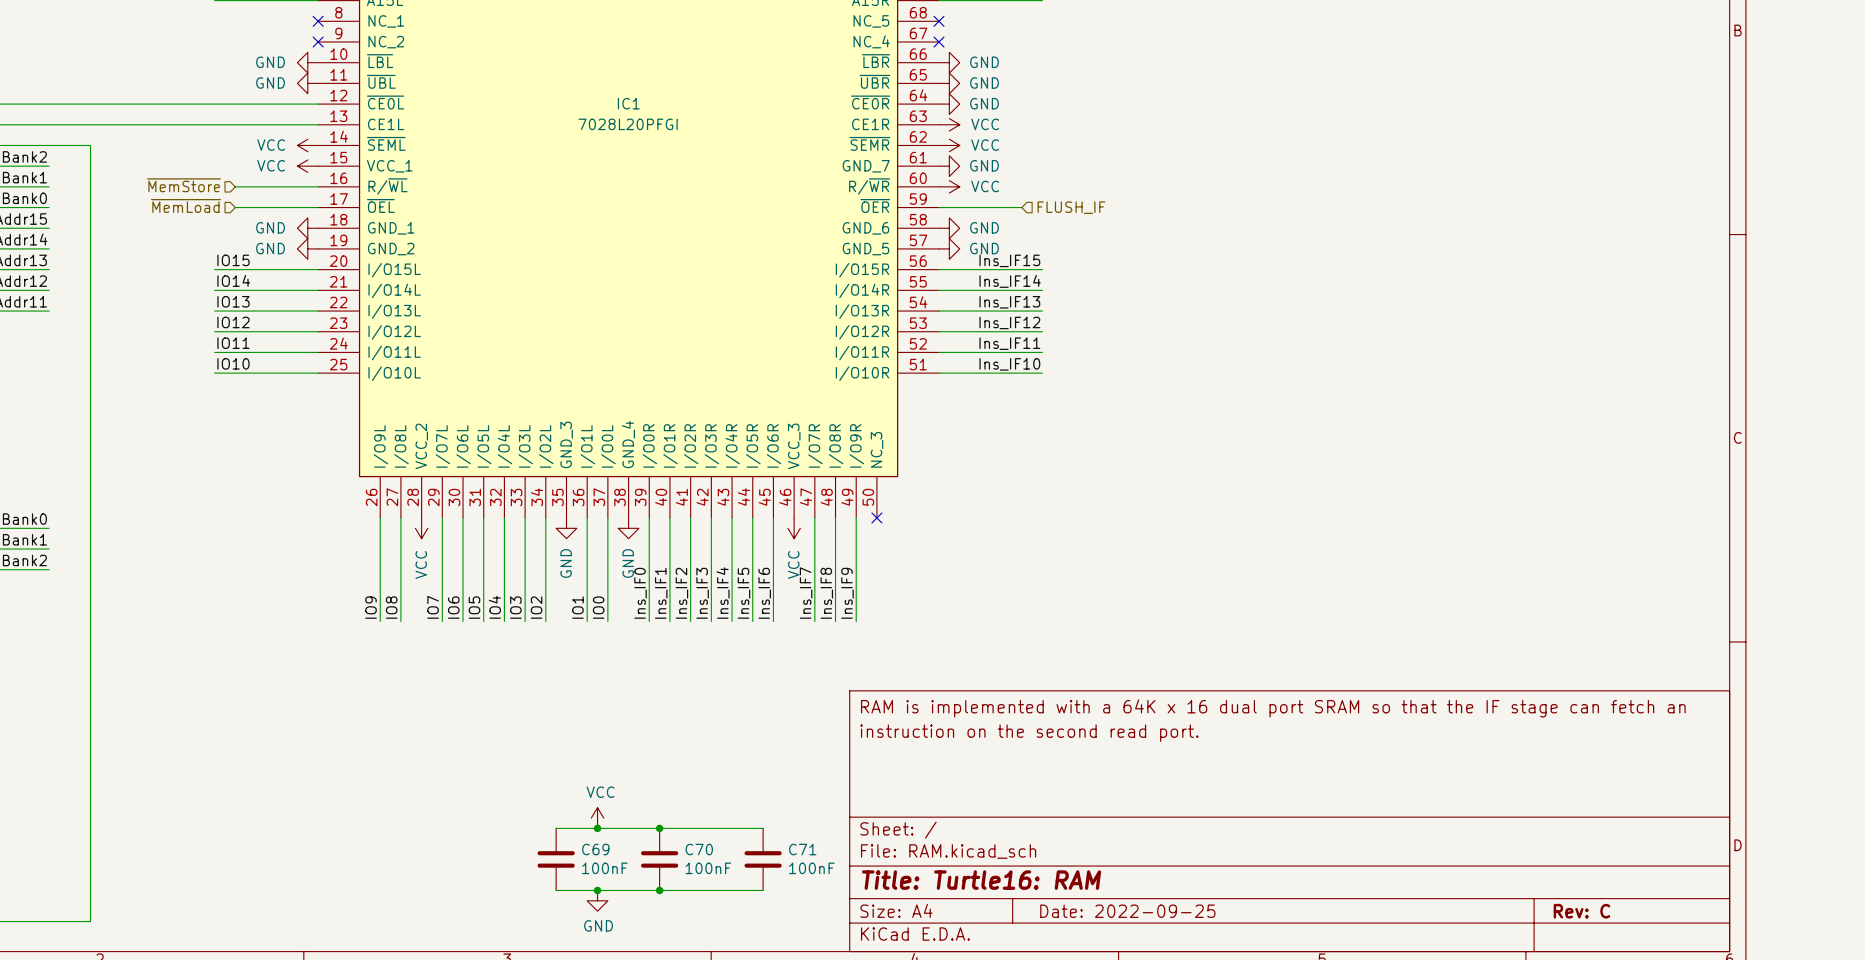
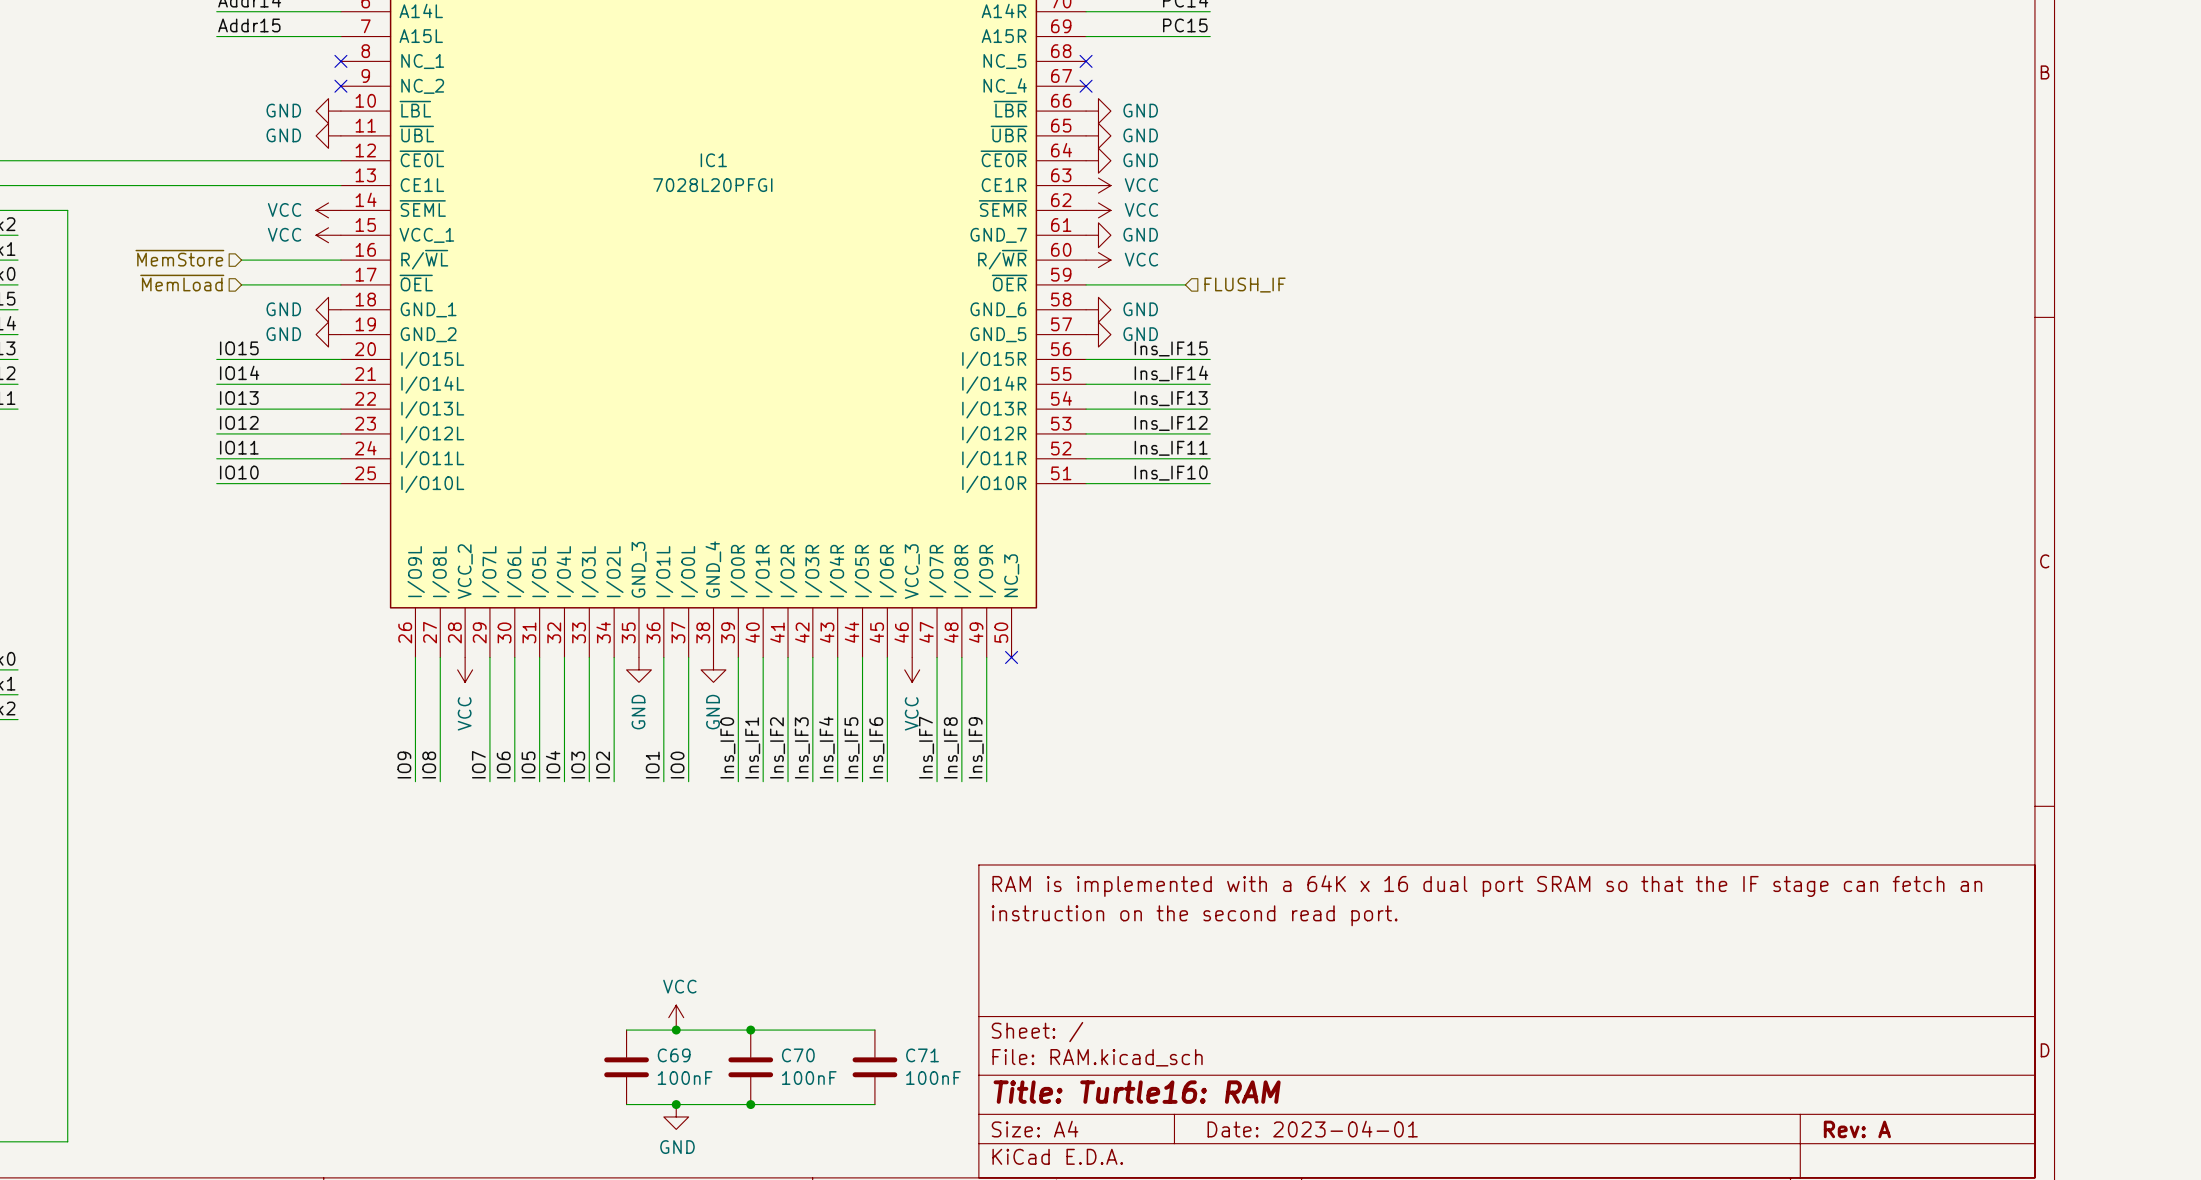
title block: Date: 2022-09-25 (1127, 911) -> Date: 2023-04-01 (1312, 1129)
title block: Rev: C (1581, 911) -> Rev: A (1857, 1129)

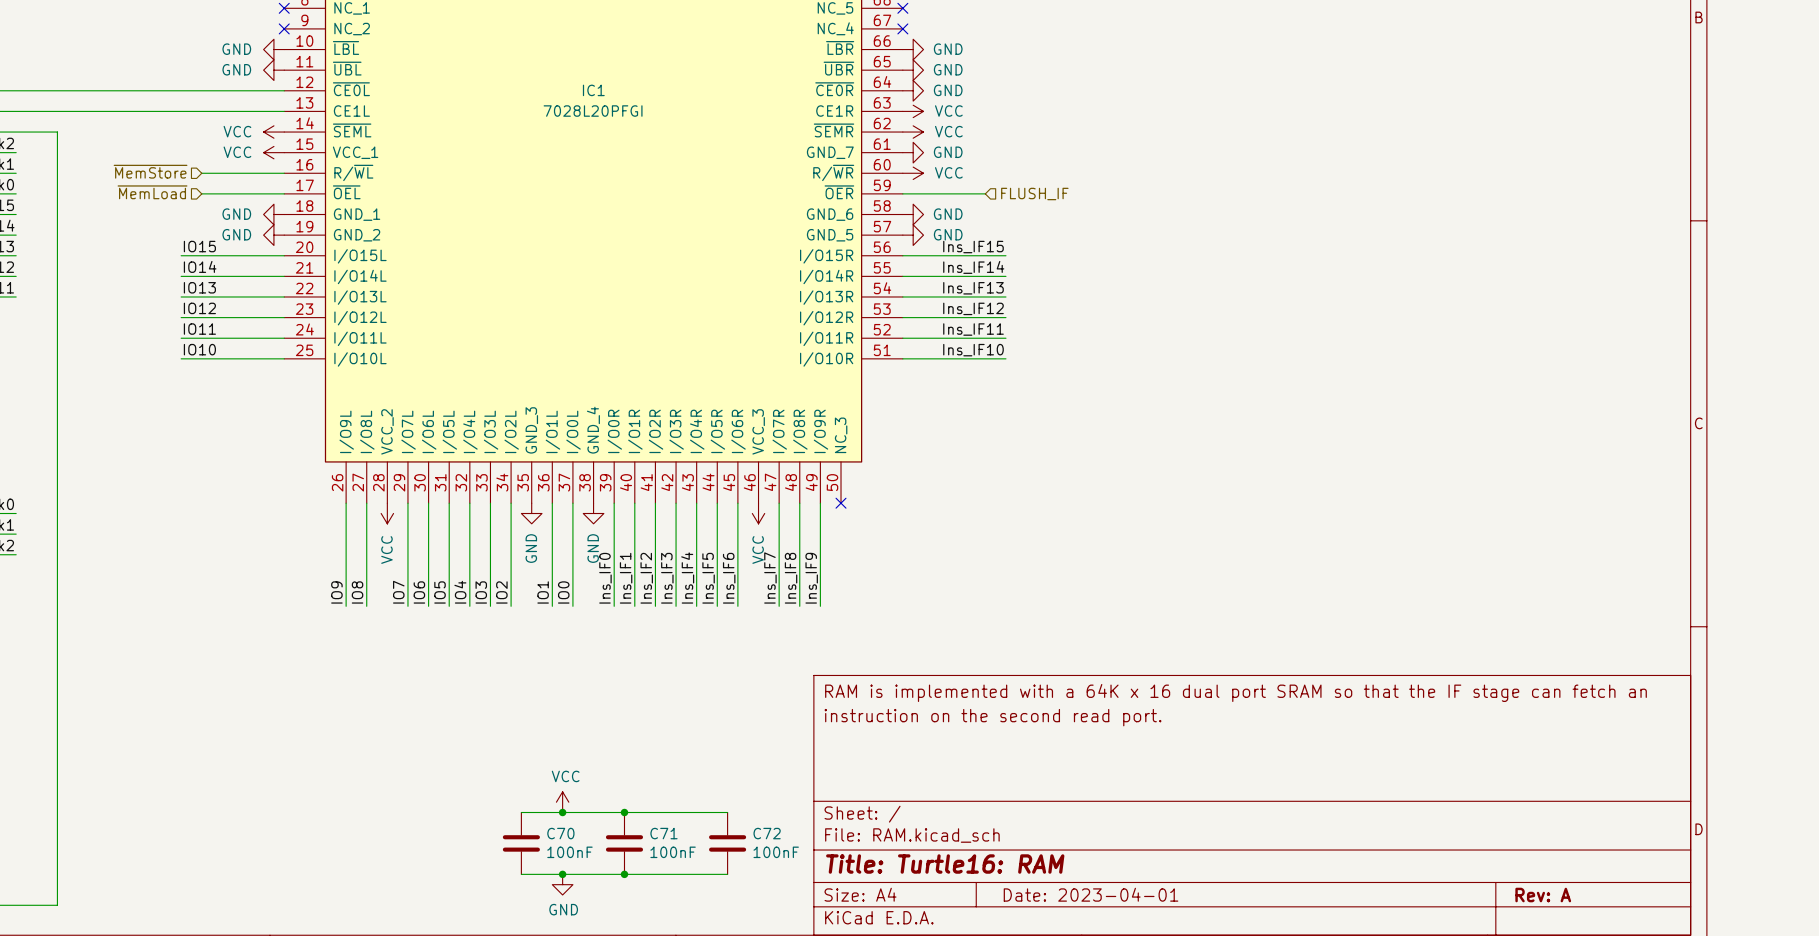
C69 name: C69 (674, 1055) -> C70 (560, 833)
C70 name: C70 (798, 1055) -> C71 (663, 833)
C71 name: C71 (922, 1055) -> C72 (767, 833)

